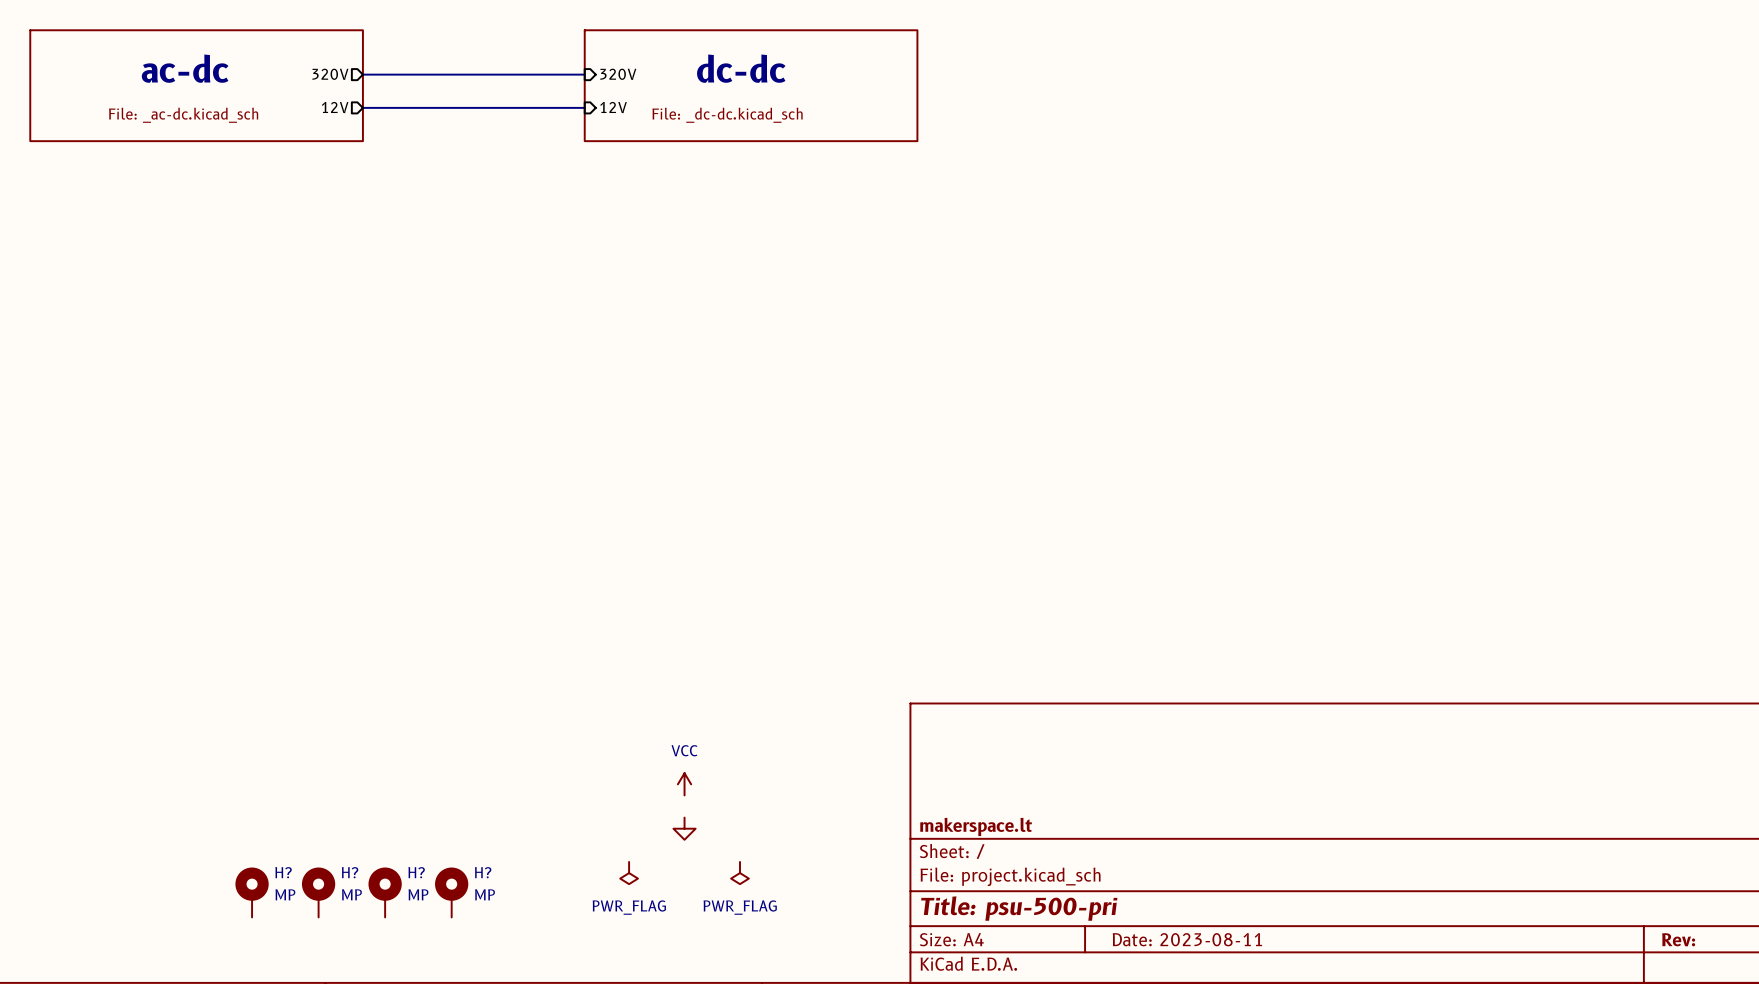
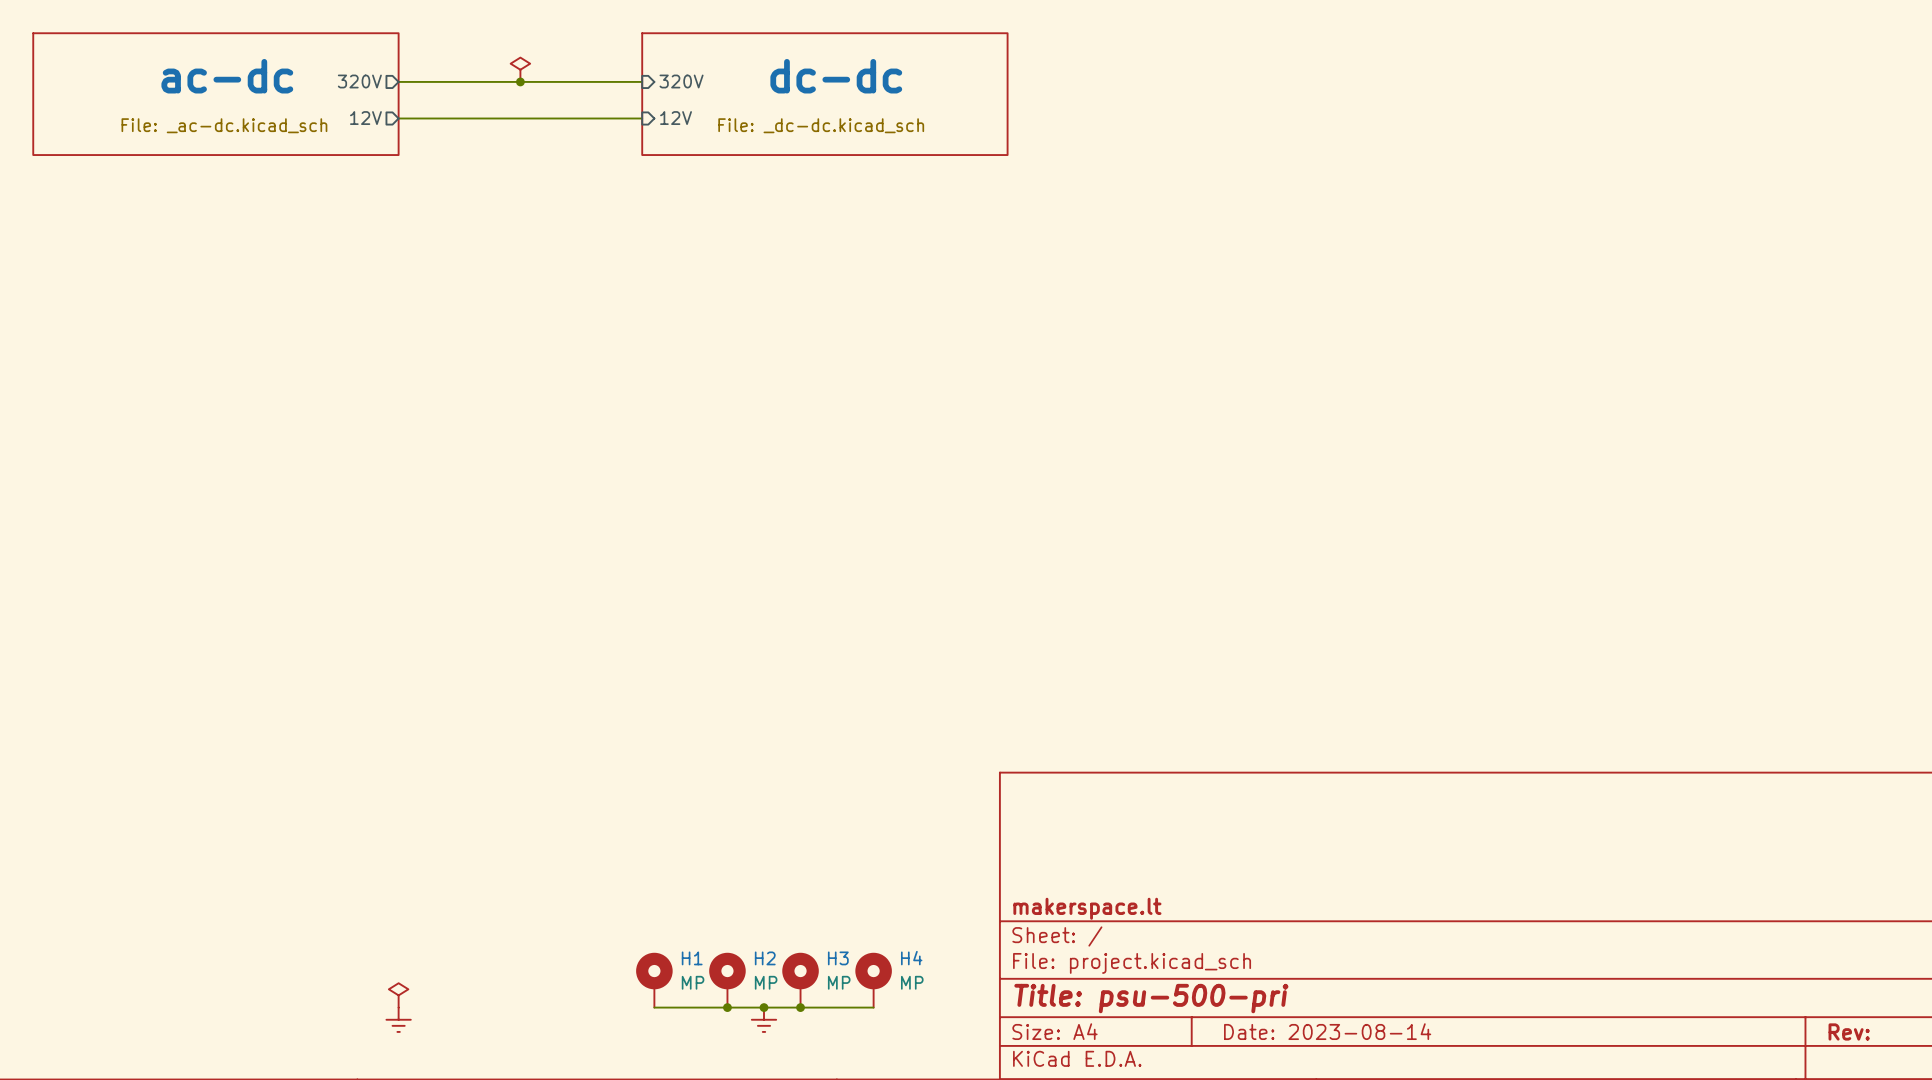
power symbol: none -> (520, 69)
junction: none -> (520, 81)
power symbol: VCC (684, 784) -> none
power symbol: (684, 828) -> none
power symbol: PWR_FLAG (629, 873) -> none
power symbol: PWR_FLAG (739, 873) -> none
H?: MP (252, 892) -> none
H?: MP (318, 892) -> none
H?: MP (385, 892) -> none
H?: MP (451, 892) -> none
H1: none -> MP (654, 980)
H2: none -> MP (727, 980)
H3: none -> MP (800, 980)
H4: none -> MP (873, 980)
power symbol: none -> (398, 995)
wire: none -> (654, 1007) (873, 1007)
junction: none -> (727, 1007)
junction: none -> (764, 1007)
junction: none -> (800, 1007)
power symbol: none -> (398, 1019)
power symbol: none -> (764, 1019)
title block: Date: 2023-08-11 (1187, 939) -> Date: 2023-08-14 (1327, 1031)

